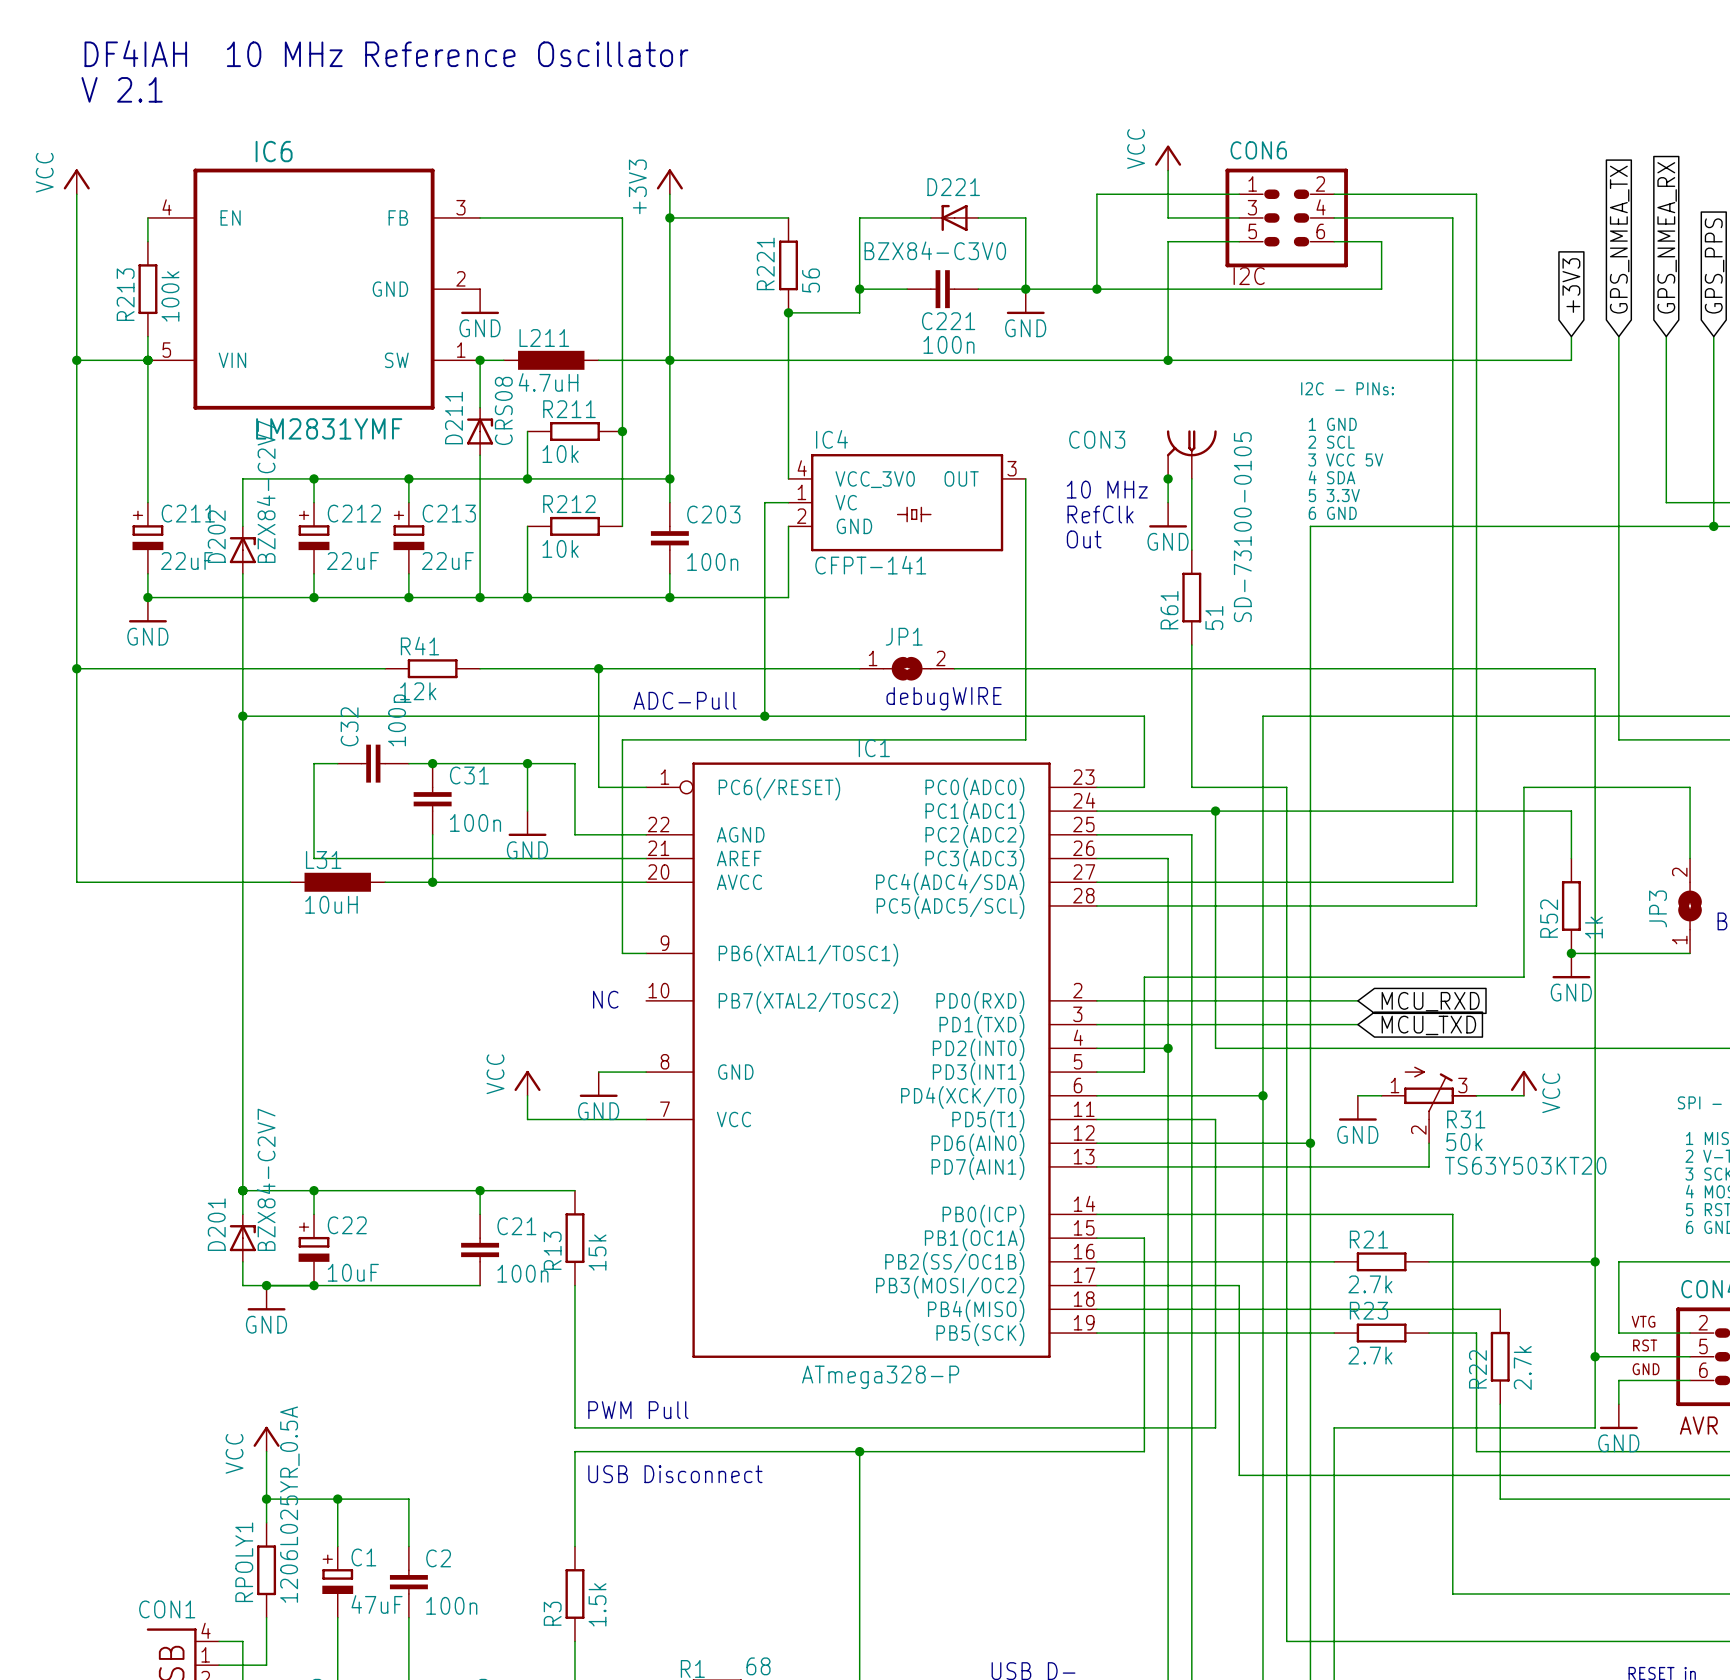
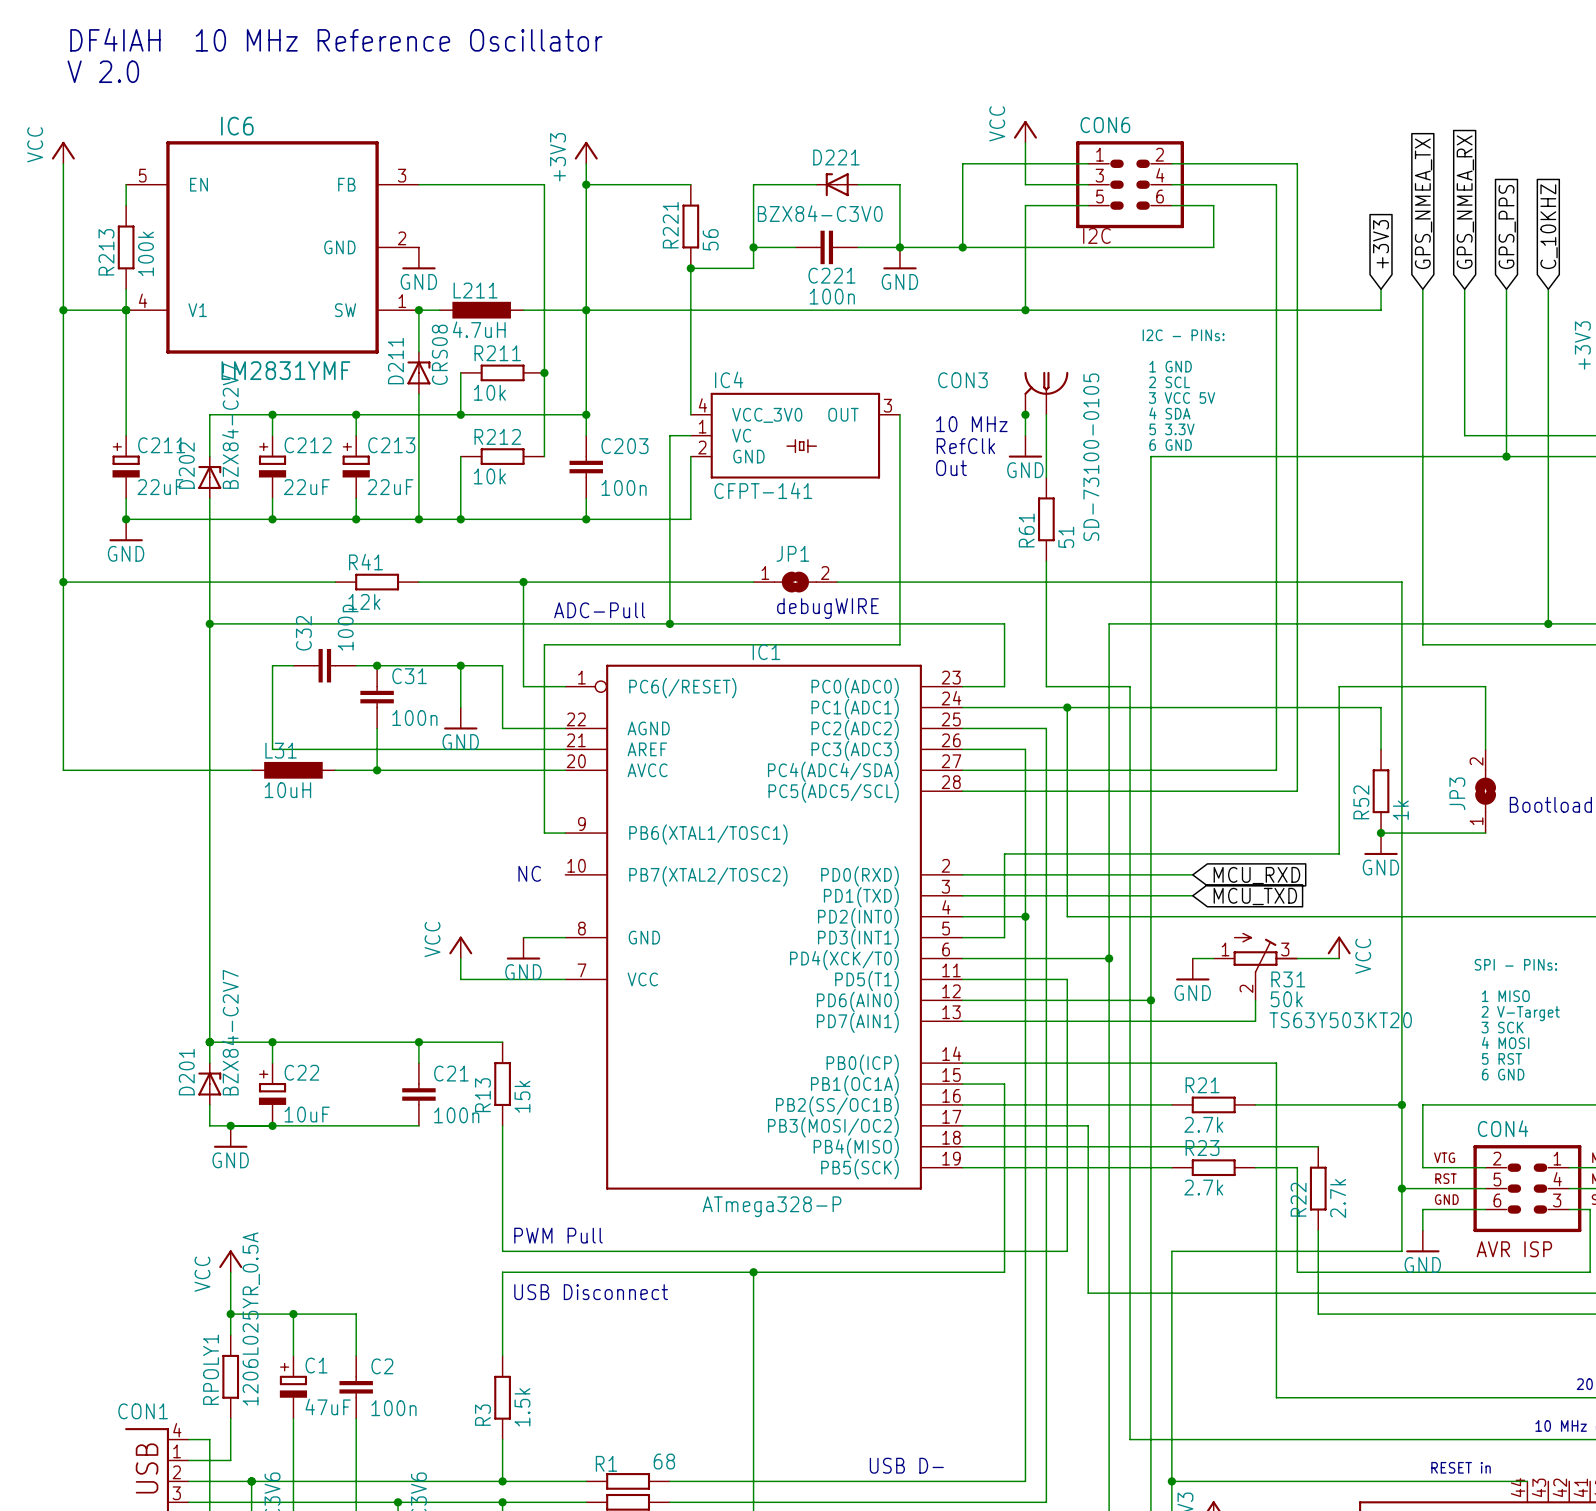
text: V 2.1 (122, 89) -> V 2.0 (103, 71)
IC6 pin number: 4 (167, 207) -> 5 (142, 175)
IC6 pin number: 5 (166, 350) -> 4 (143, 300)
IC6 pin name: VIN (232, 360) -> V1 (197, 310)

